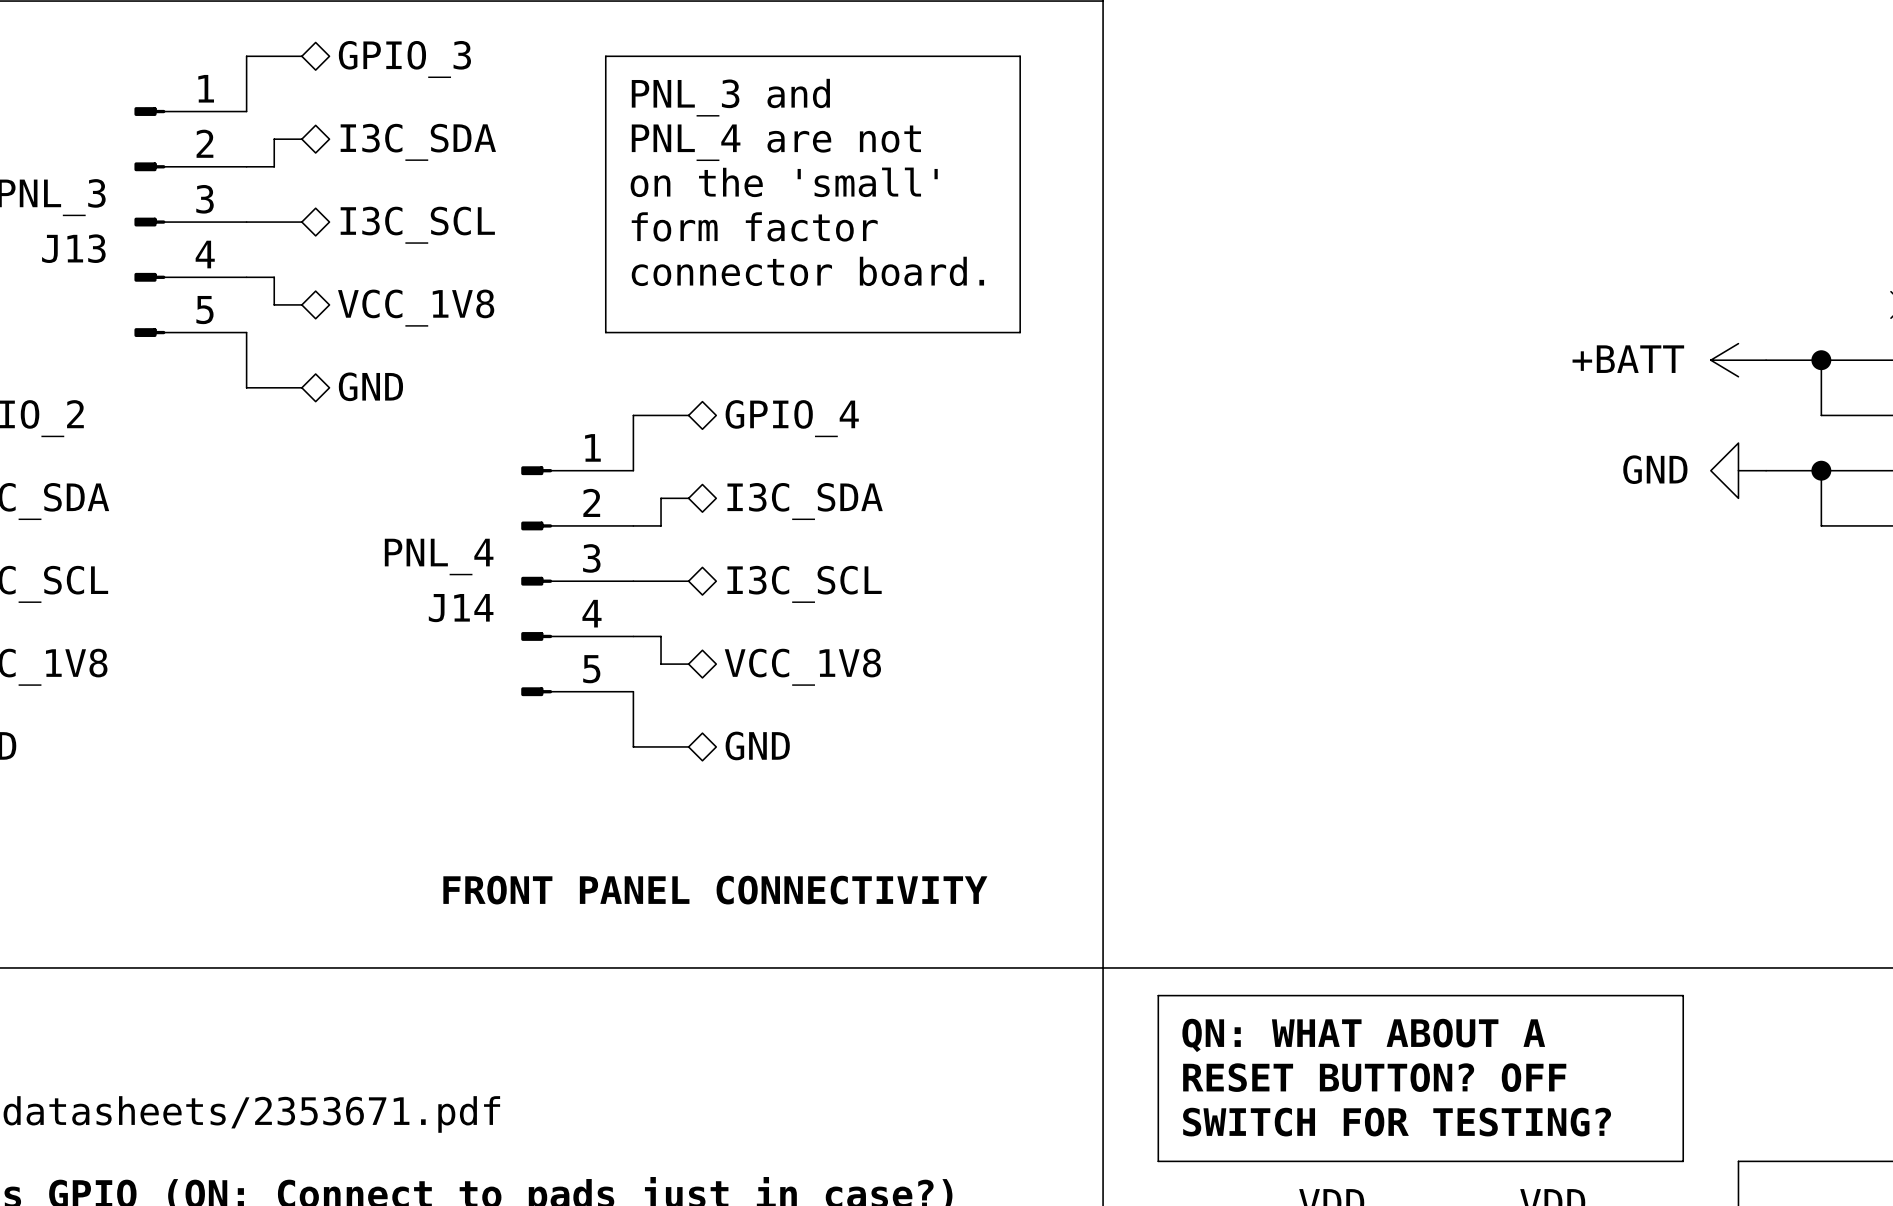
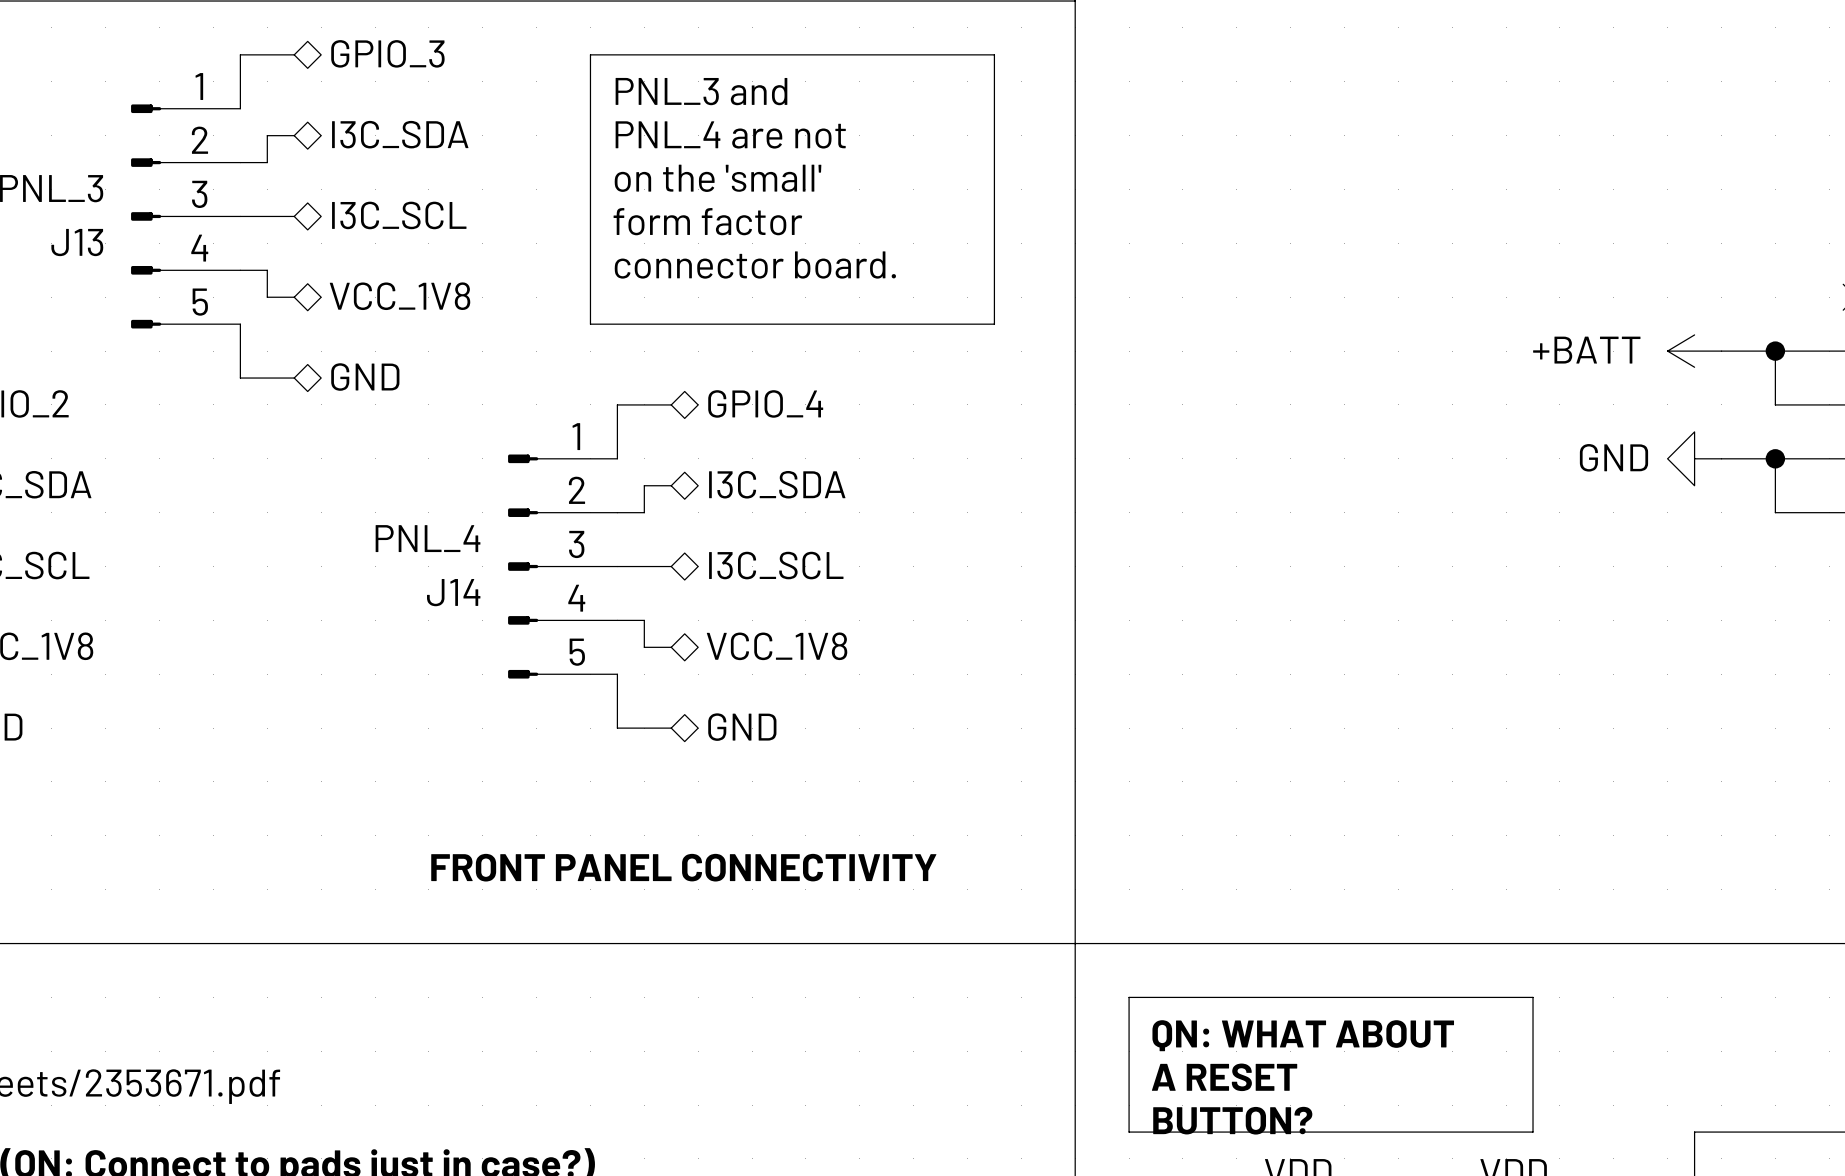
line: (1158, 1023) (1158, 995) (1683, 995) (1683, 1161) (1572, 1161) -> (1129, 997) (1533, 997) (1533, 1132)
text: QN: WHAT ABOUT A (1363, 1035) -> QN: WHAT ABOUT (1303, 1035)
text: RESET BUTTON? OFF (1374, 1077) -> none
text: none -> A RESET (1224, 1077)
text: SWITCH FOR TESTING? (1397, 1122) -> none
text: none -> BUTTON? (1232, 1120)

